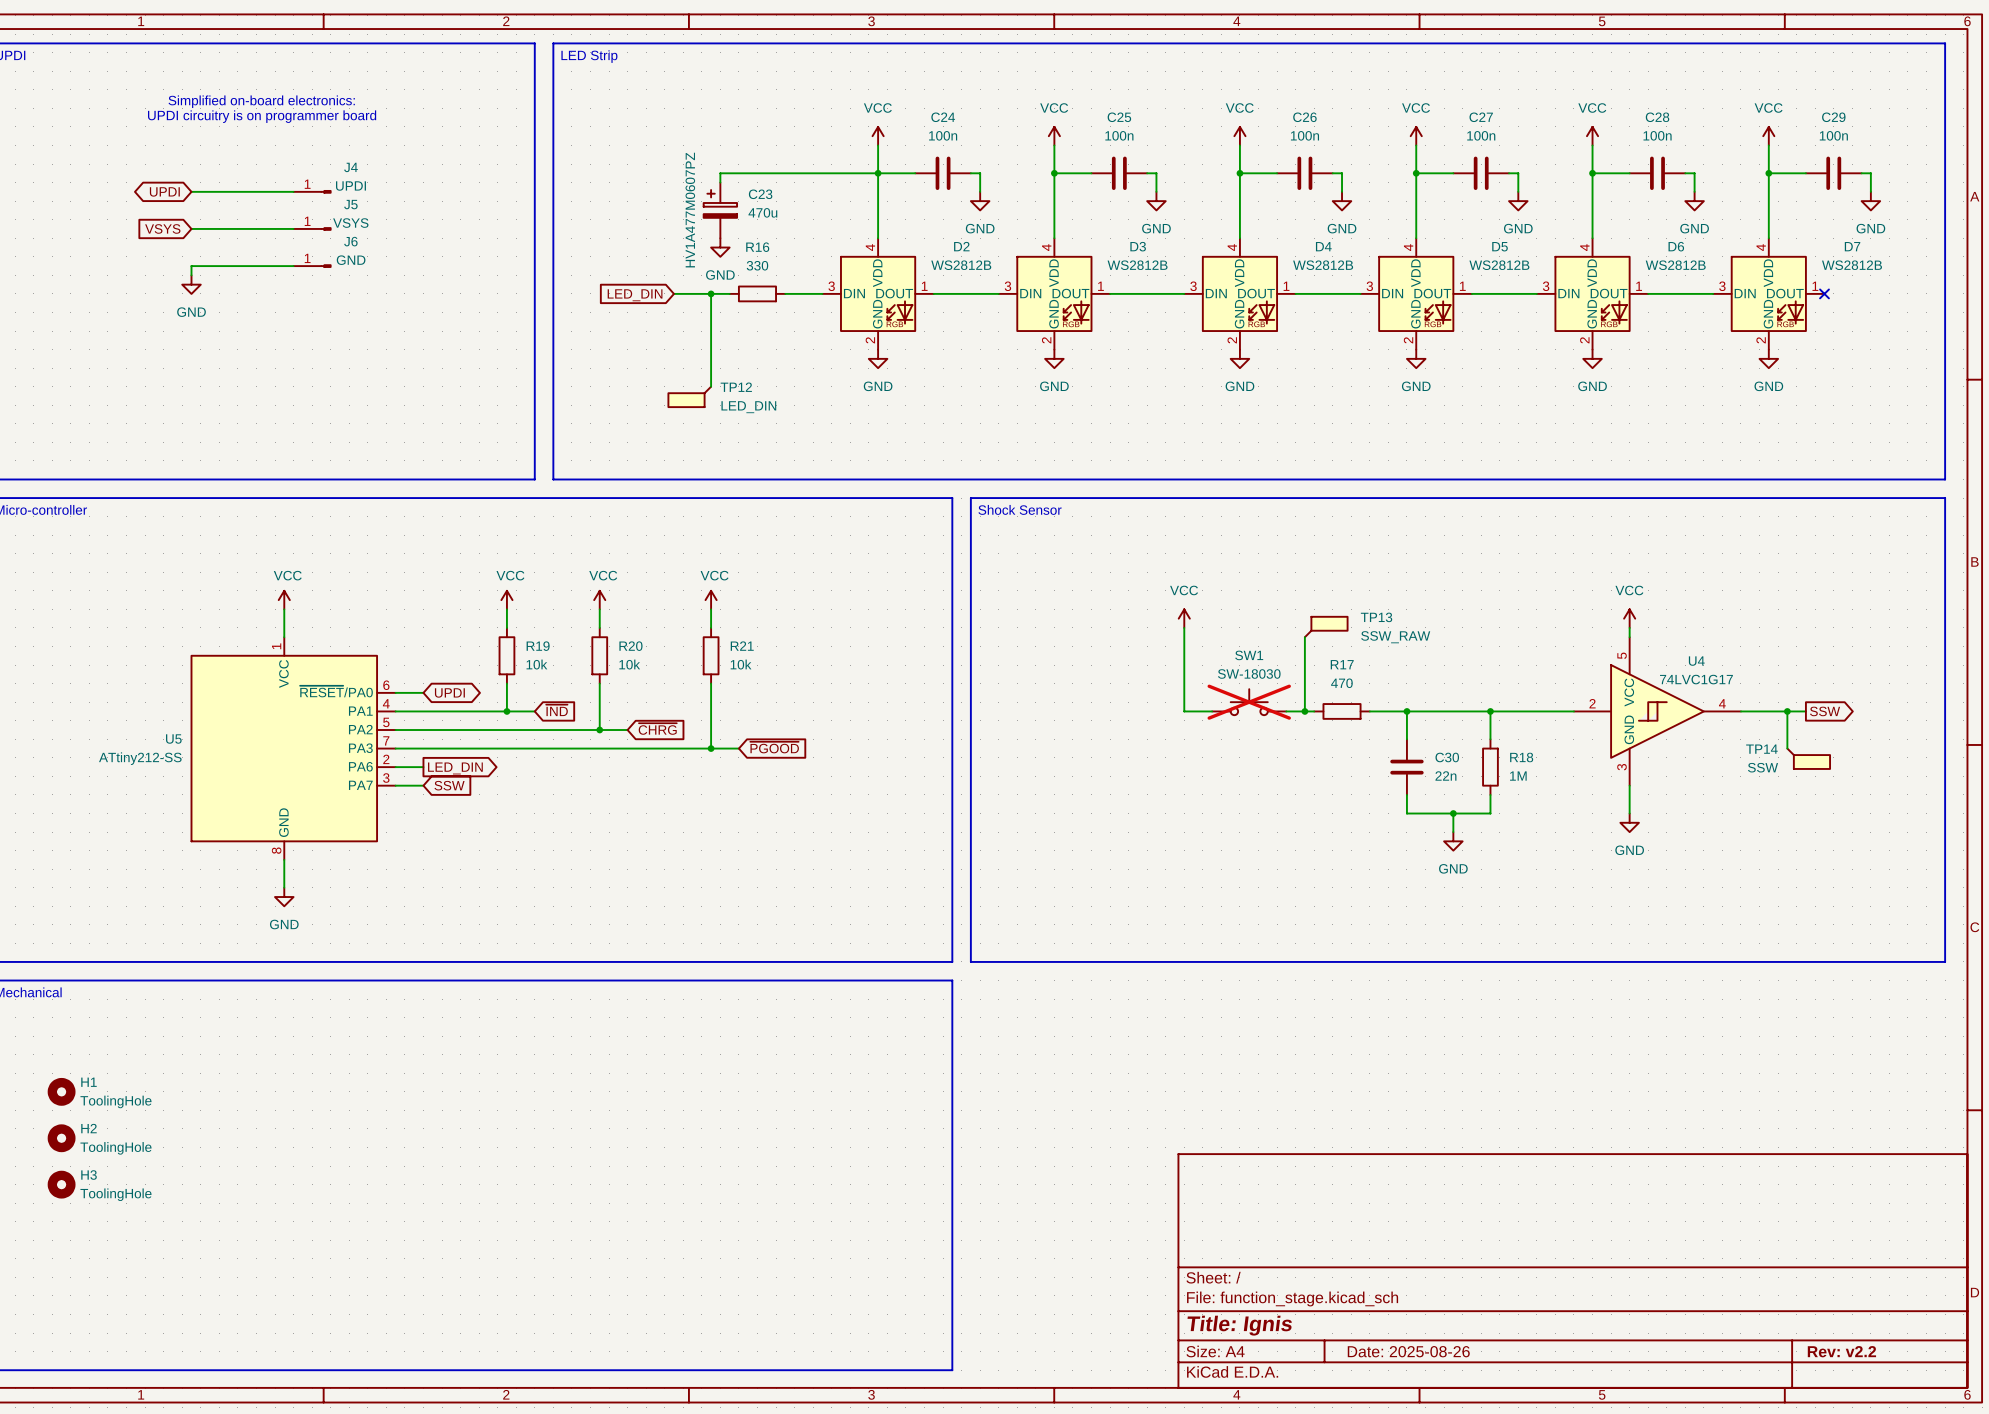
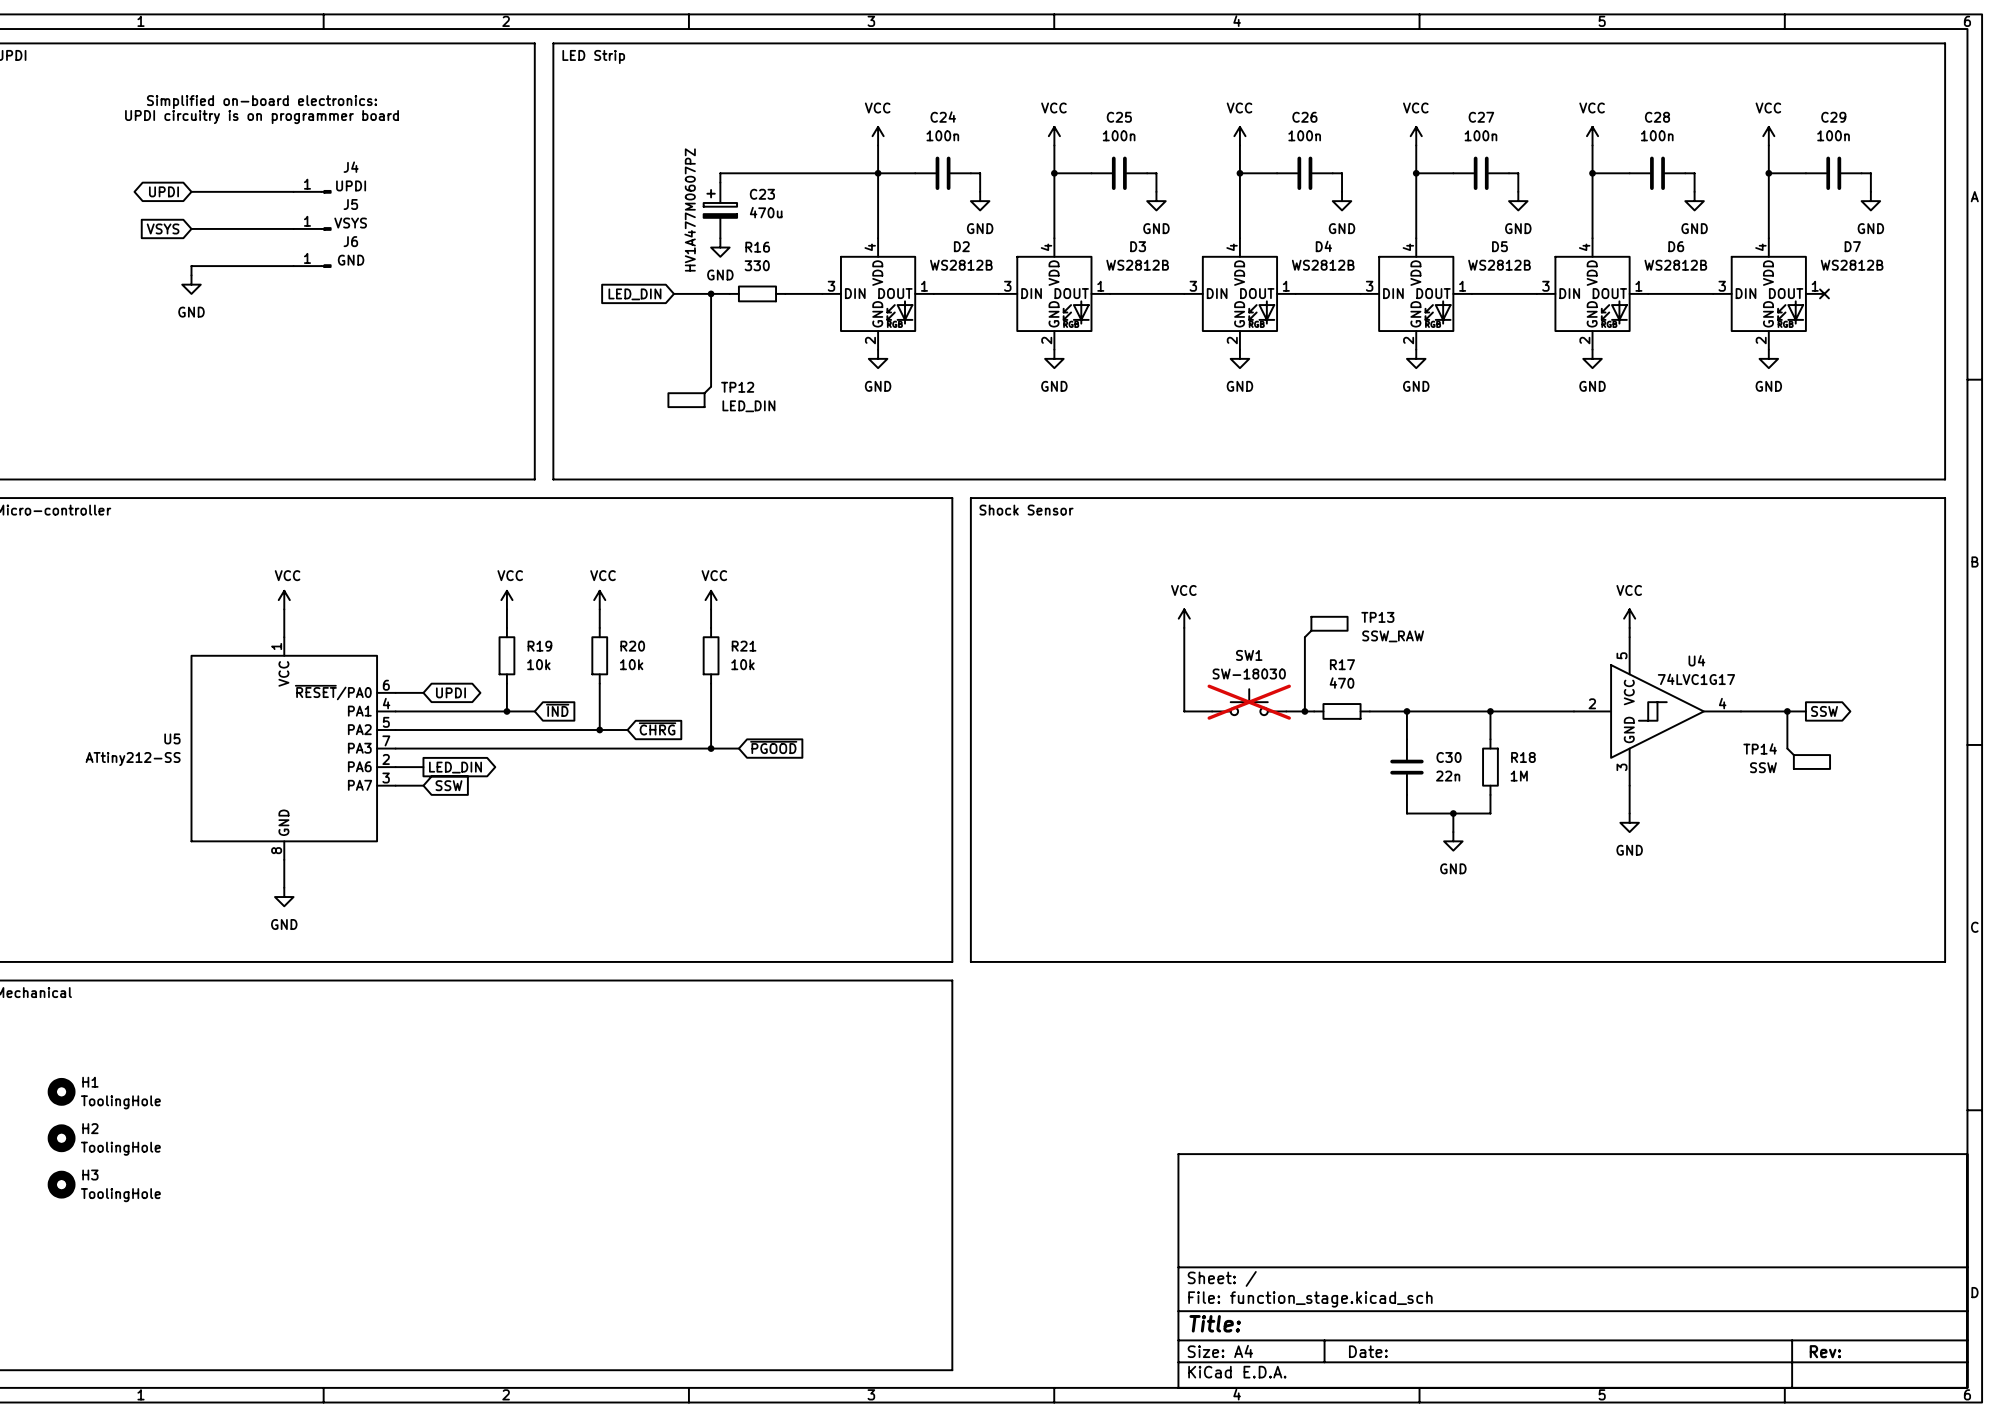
title block: Title: Ignis (1239, 1325) -> Title: (1215, 1323)
title block: Date: 2025-08-26 (1408, 1351) -> Date: (1368, 1351)
title block: Rev: v2.2 (1841, 1351) -> Rev: (1825, 1351)

